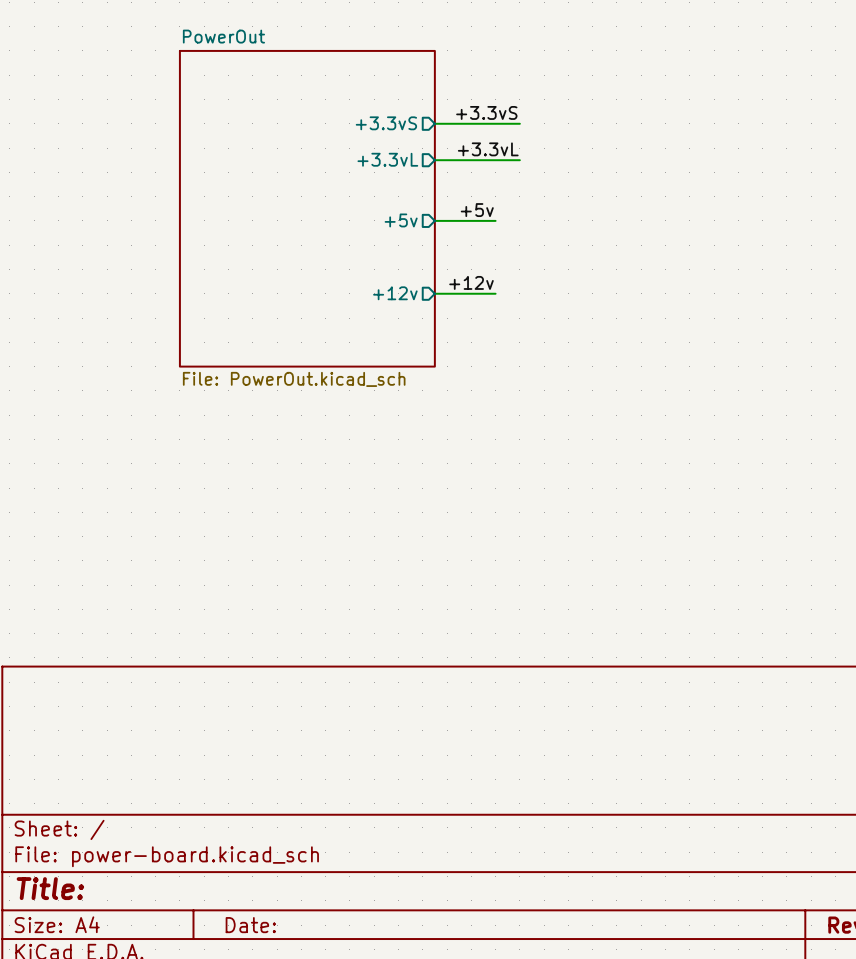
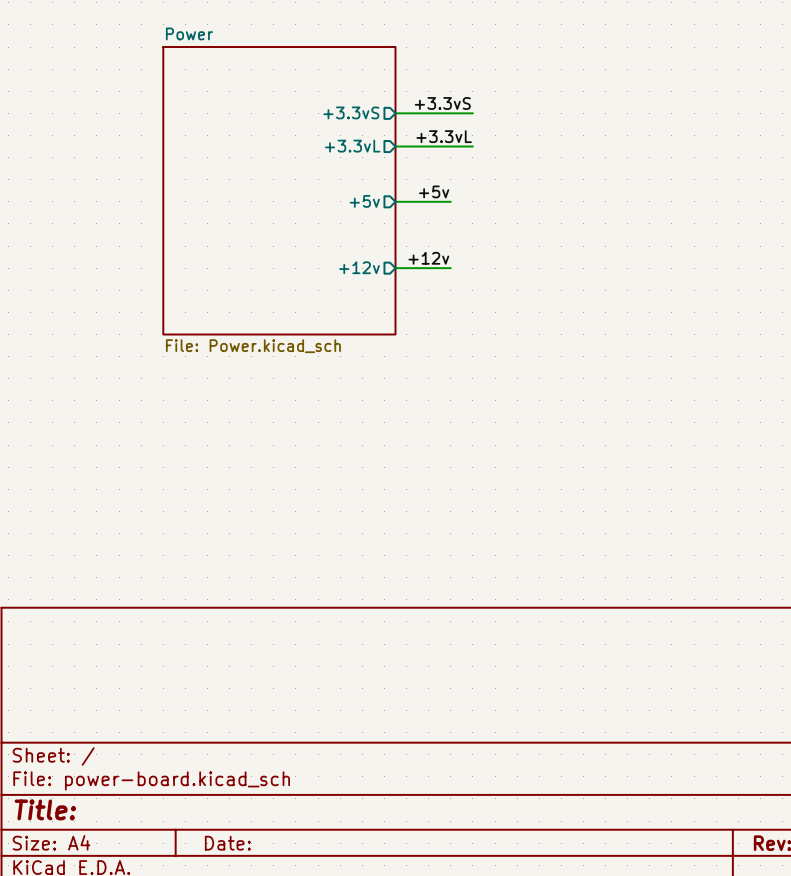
sheet PowerOut name: PowerOut (223, 36) -> Power (189, 33)
sheet PowerOut value: File: PowerOut.kicad_sch (294, 379) -> File: Power.kicad_sch (253, 346)

